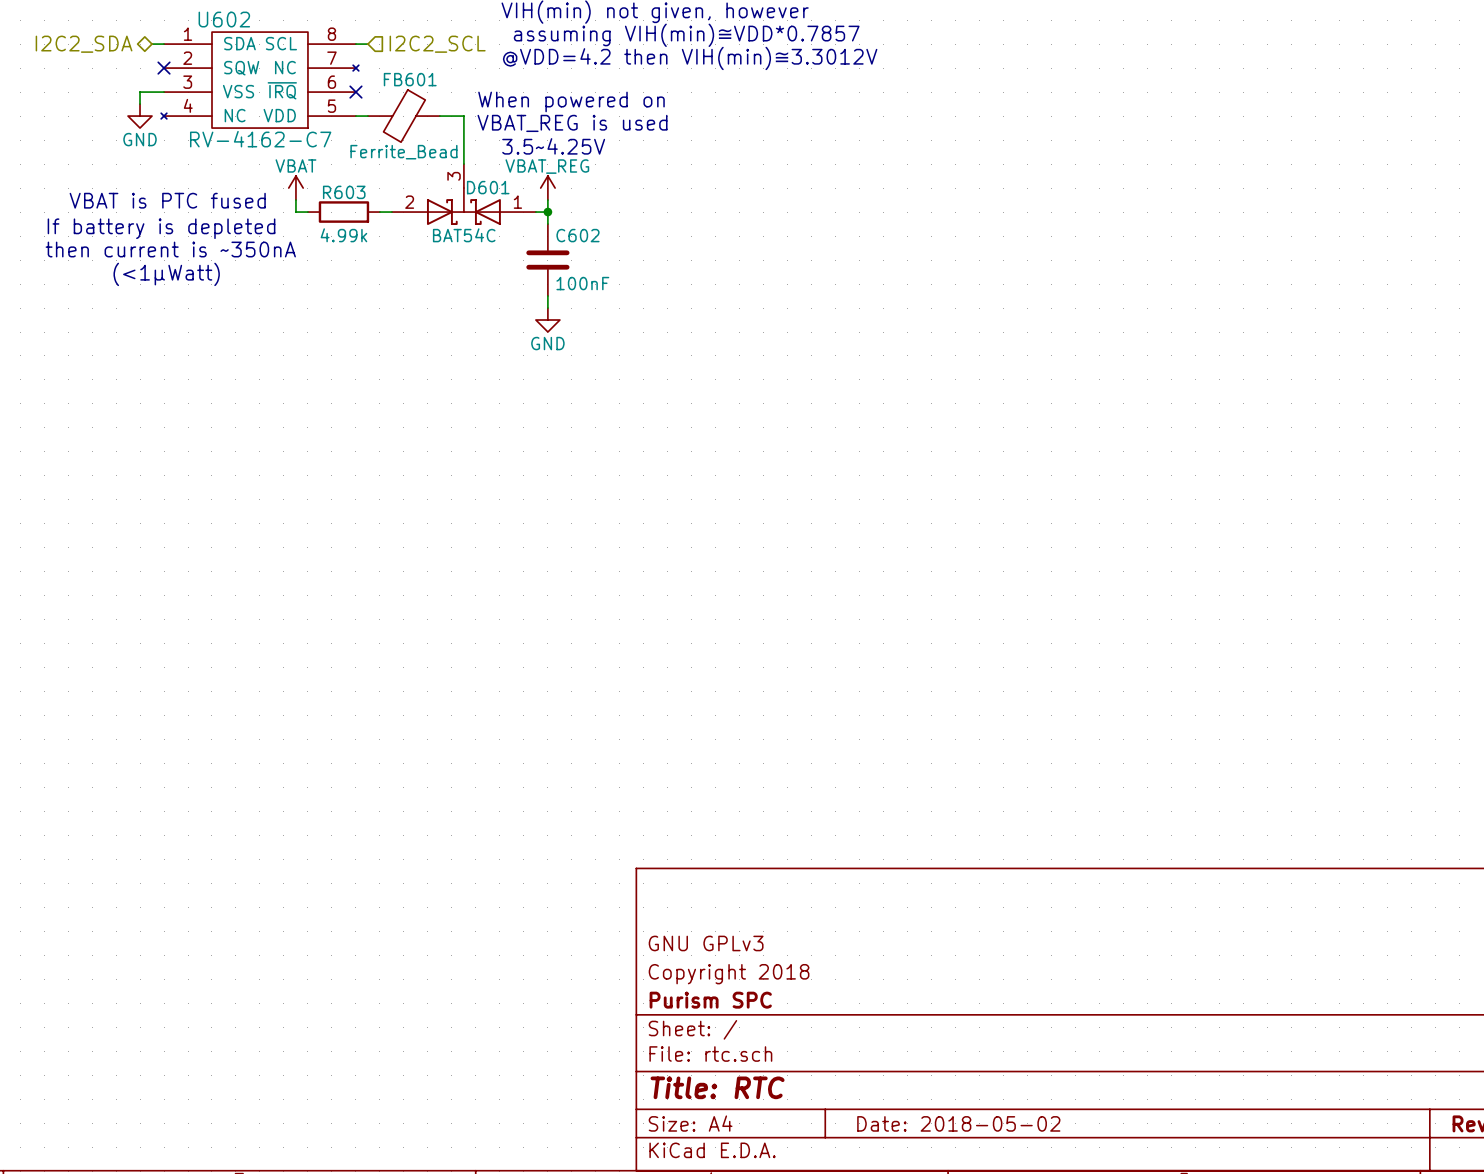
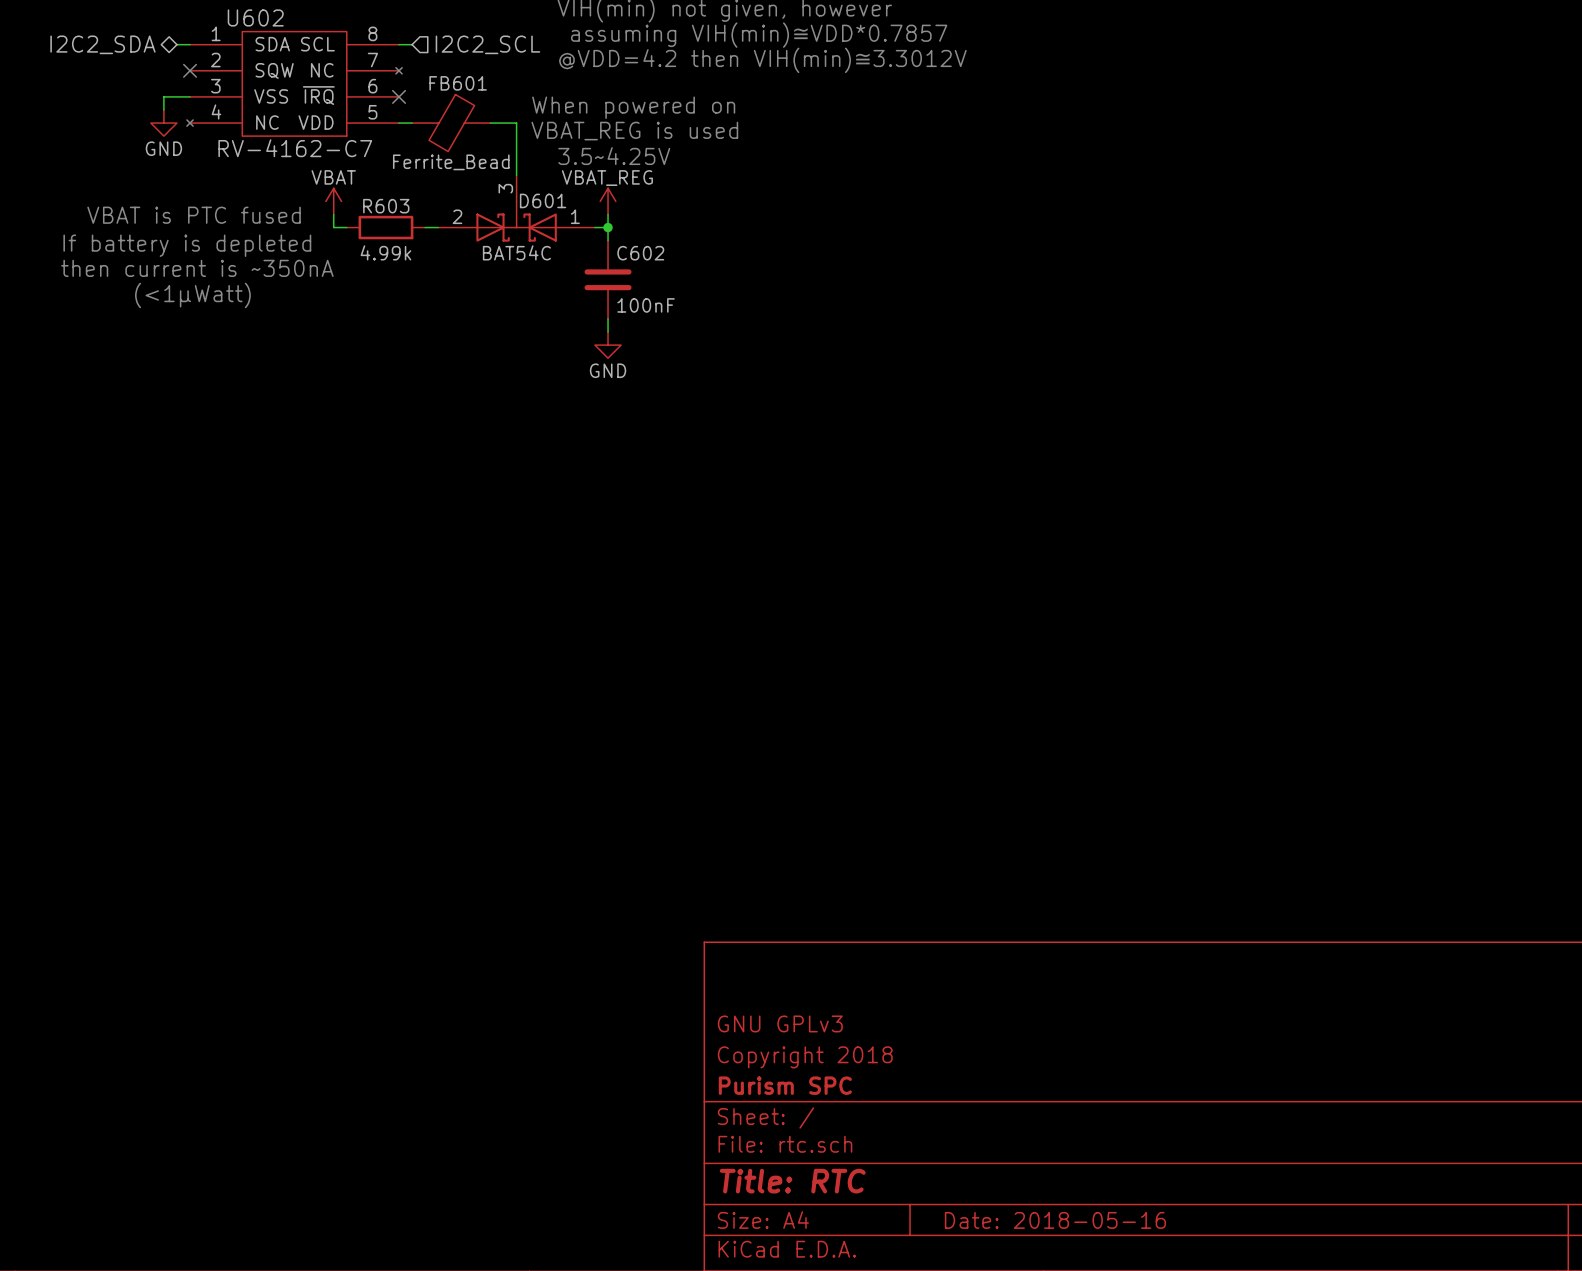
title block: Date: 2018-05-02 (958, 1123) -> Date: 2018-05-16 (1055, 1220)

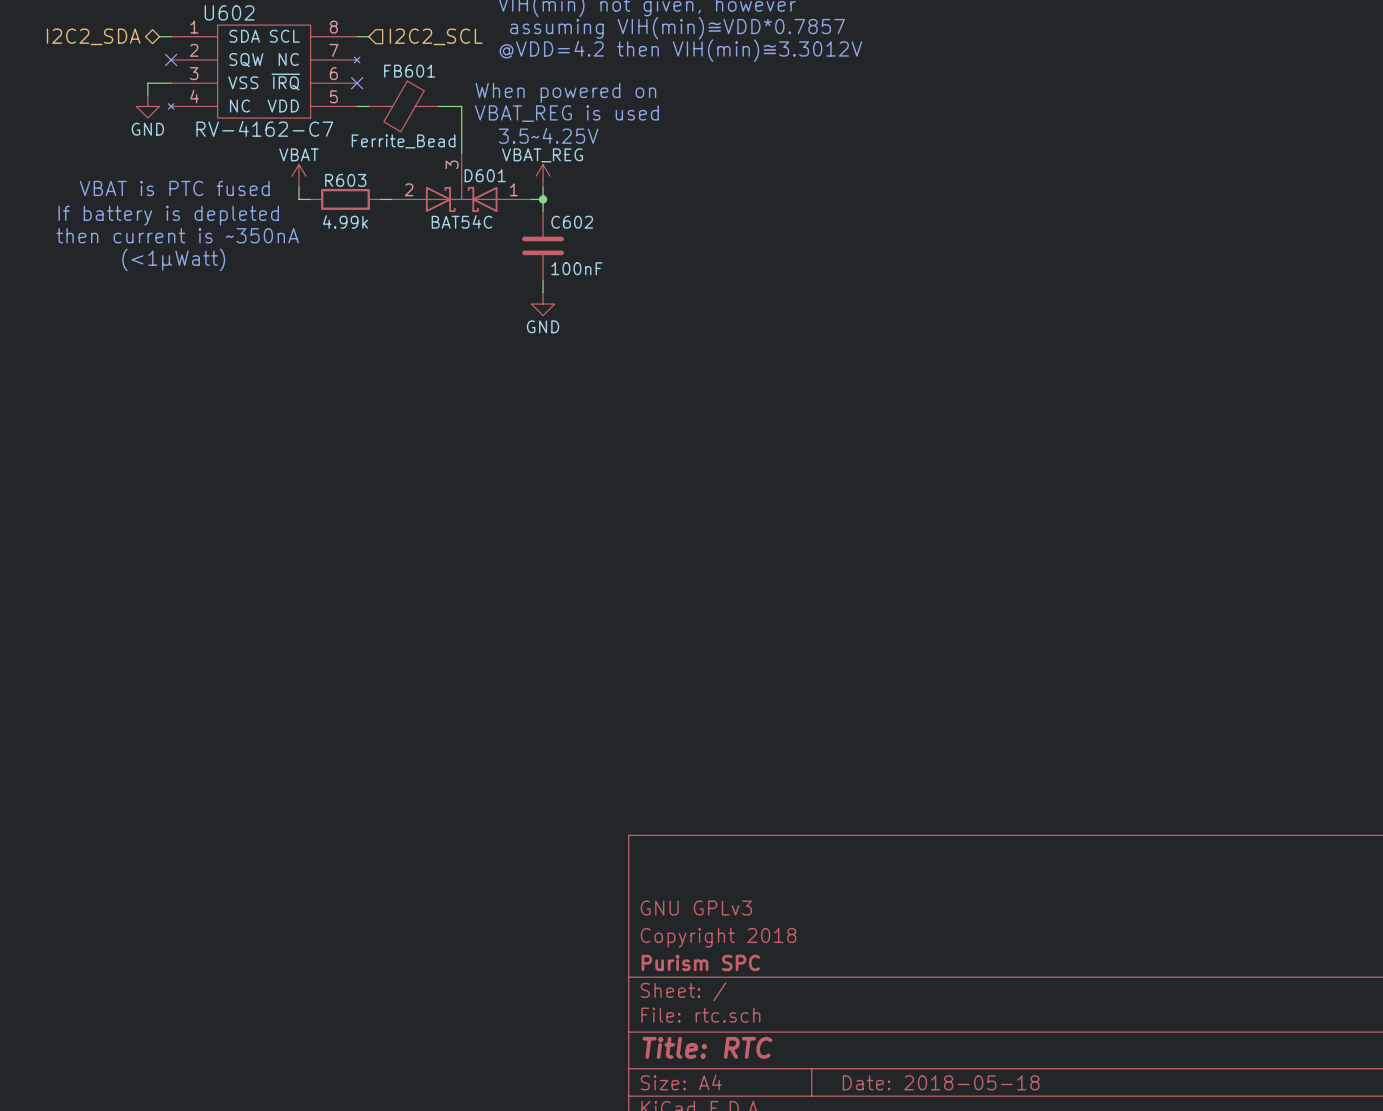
title block: Date: 2018-05-16 (1055, 1220) -> Date: 2018-05-18 (941, 1082)

